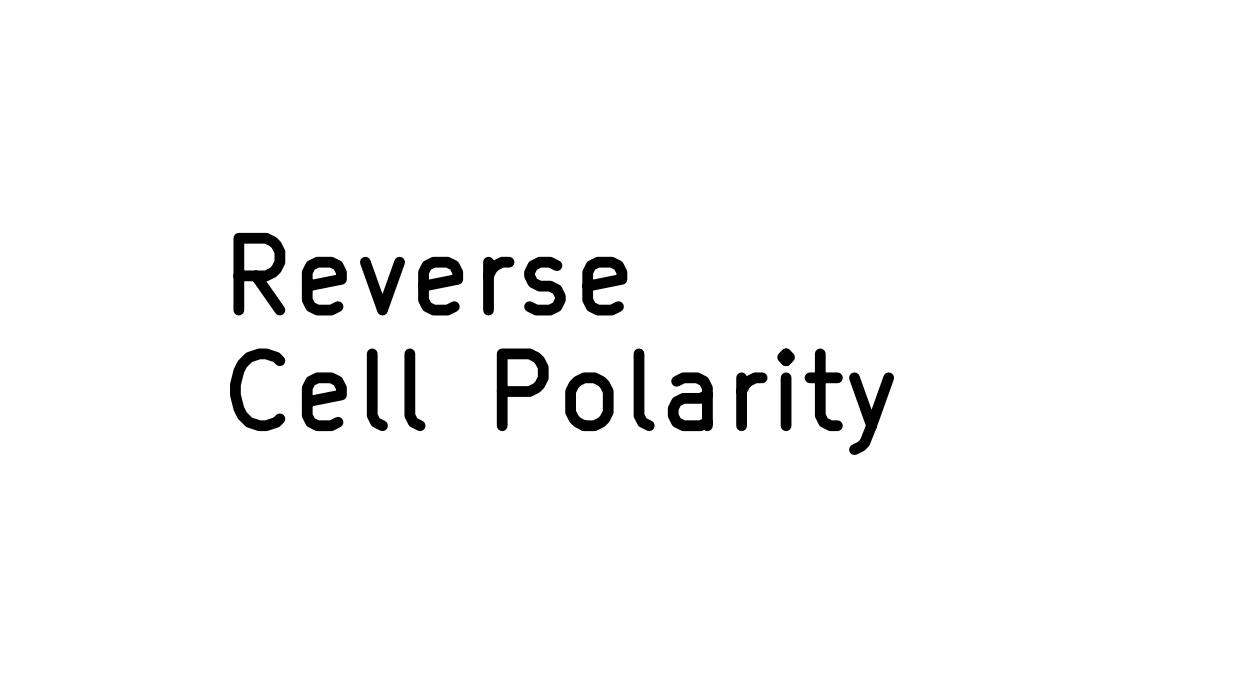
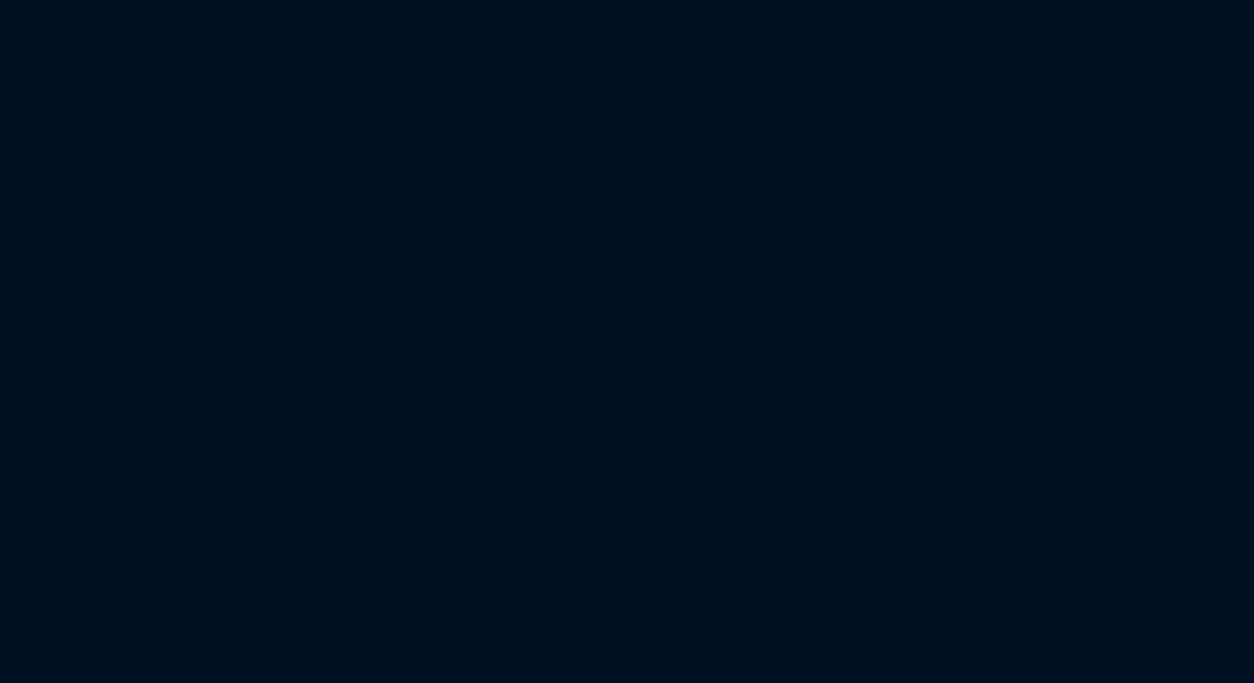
text: Reverse (430, 274) -> none
text: Cell Polarity (562, 401) -> none

